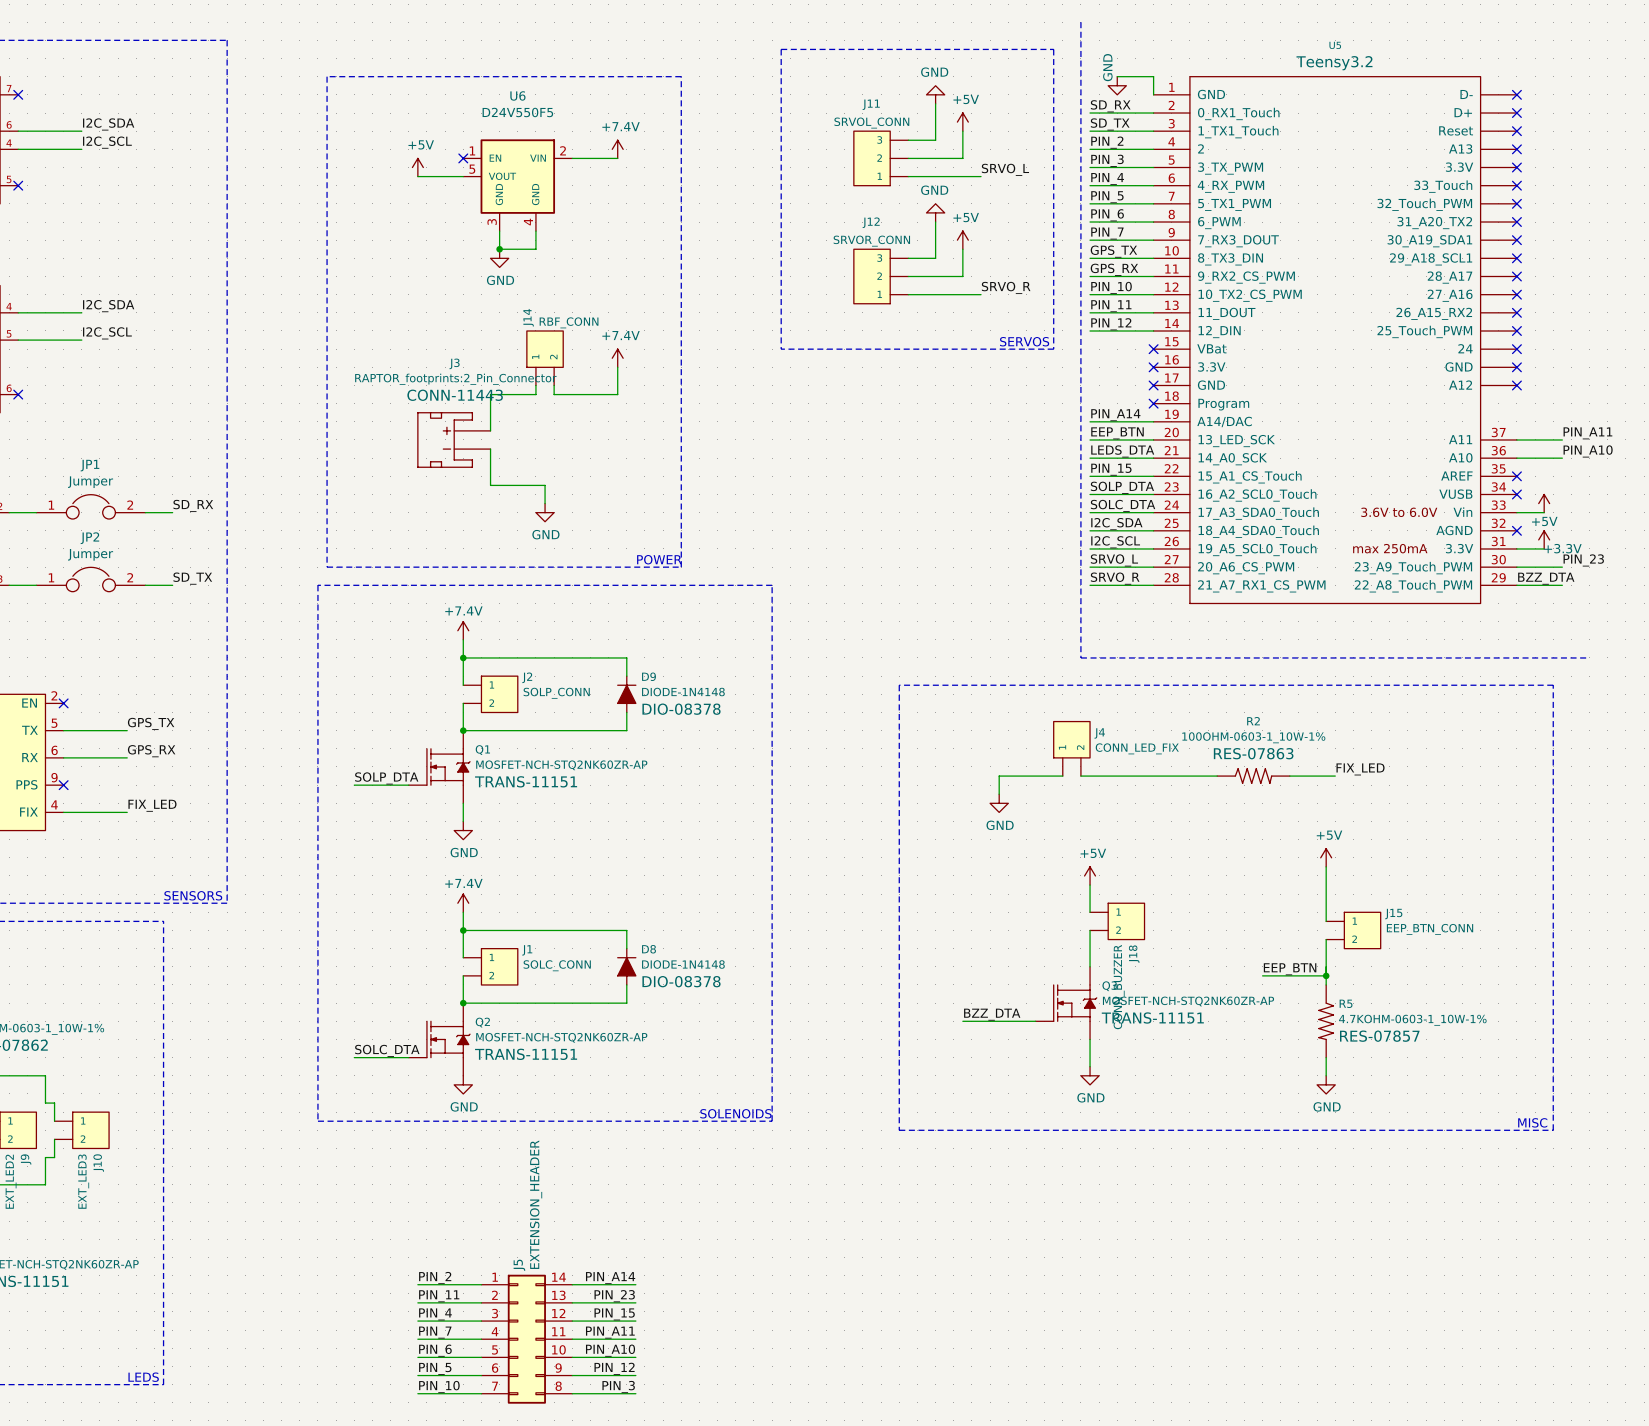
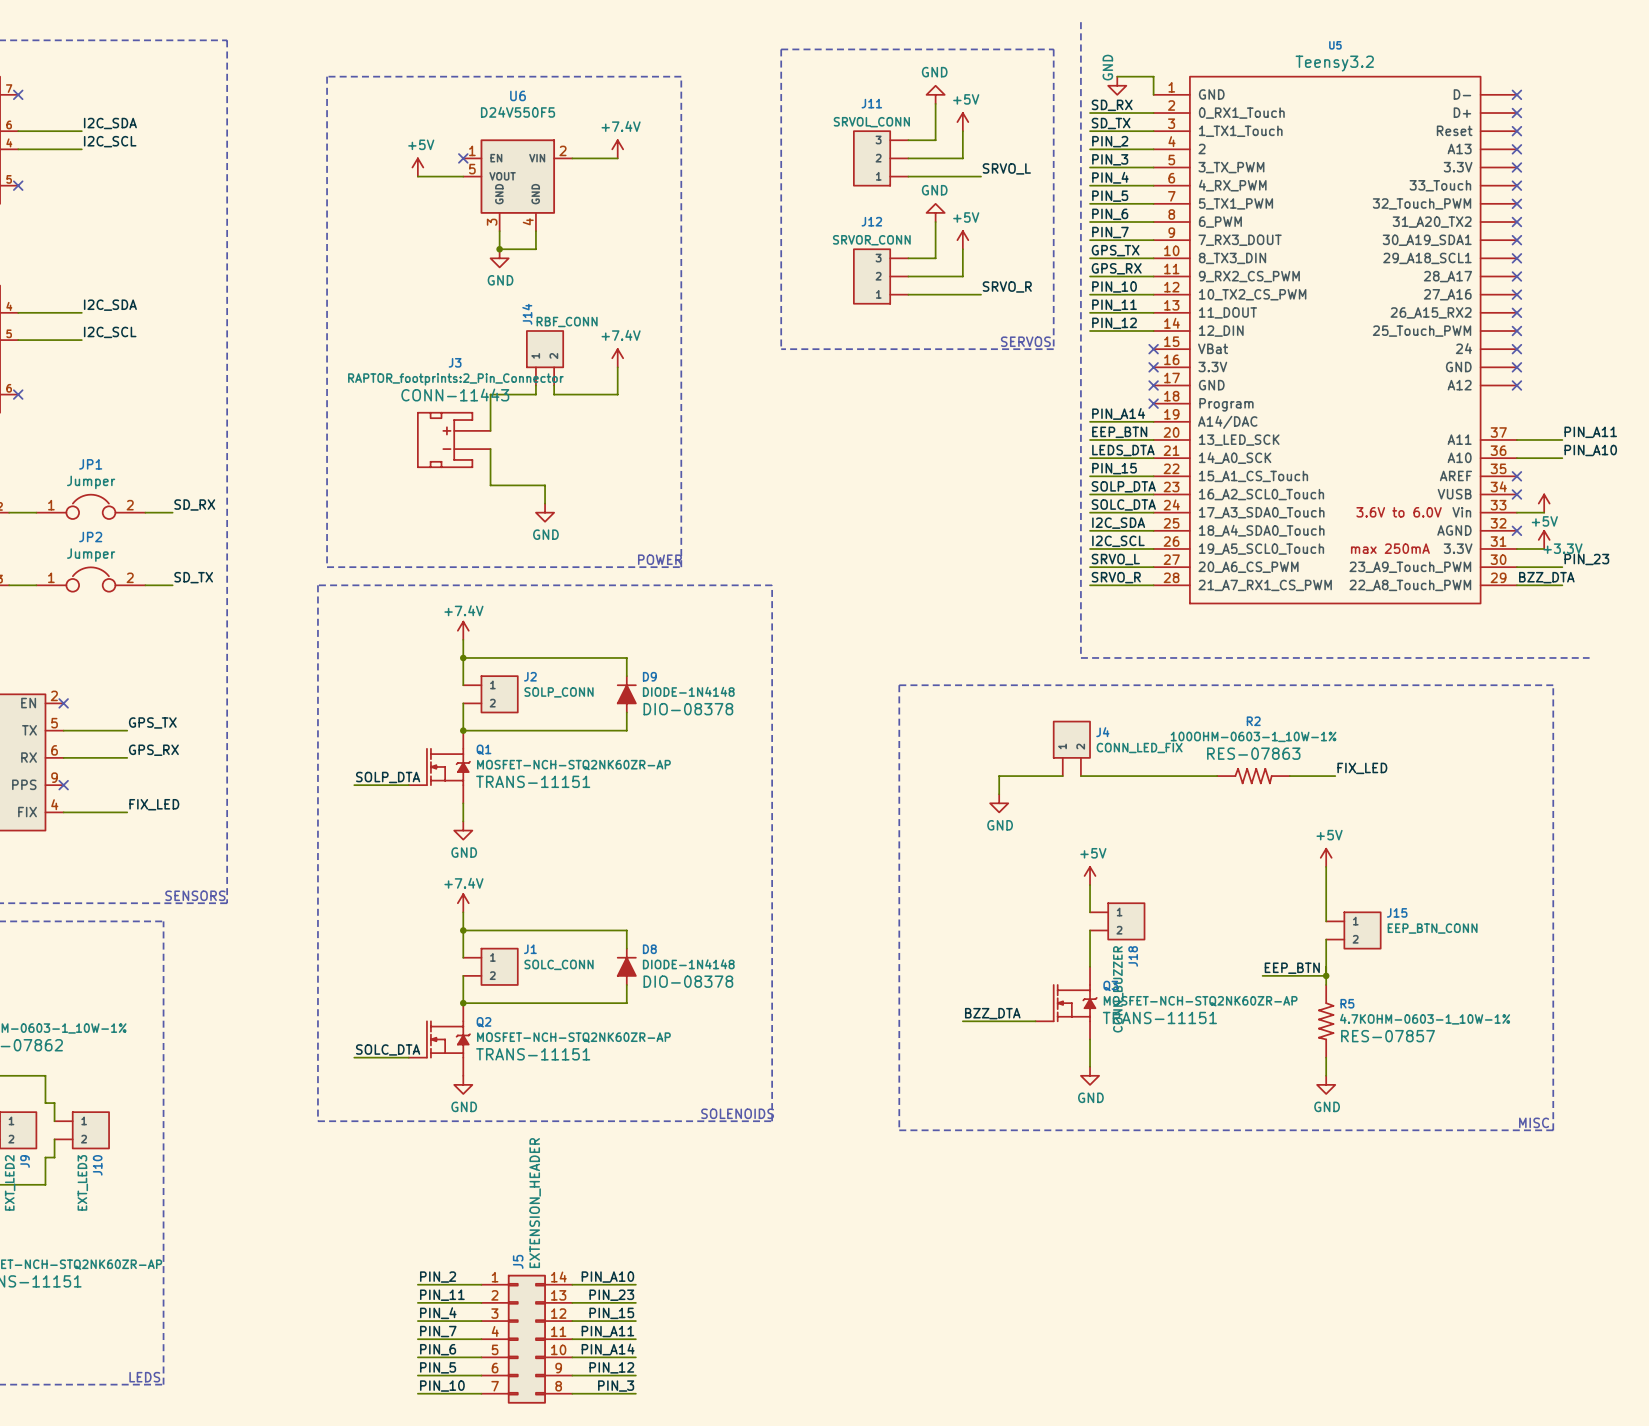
label: PIN_A14 (610, 1278) -> PIN_A10 (607, 1277)
label: PIN_A10 (610, 1350) -> PIN_A14 (608, 1349)

